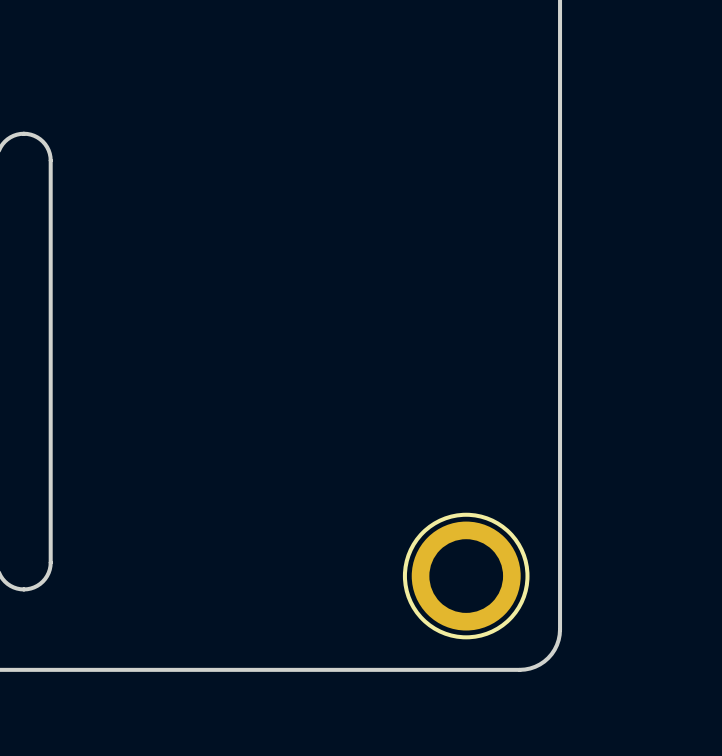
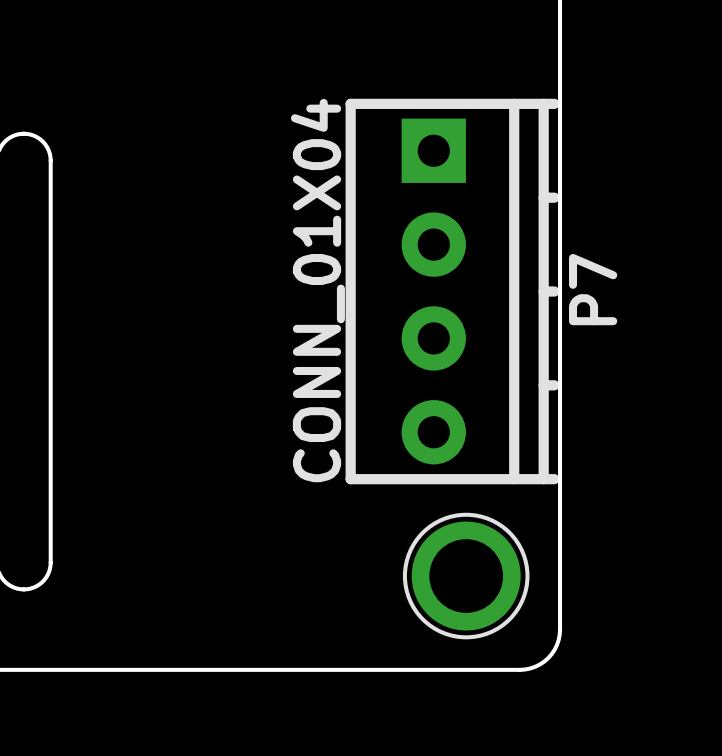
P7: none -> CONN_01X04 (452, 291)

